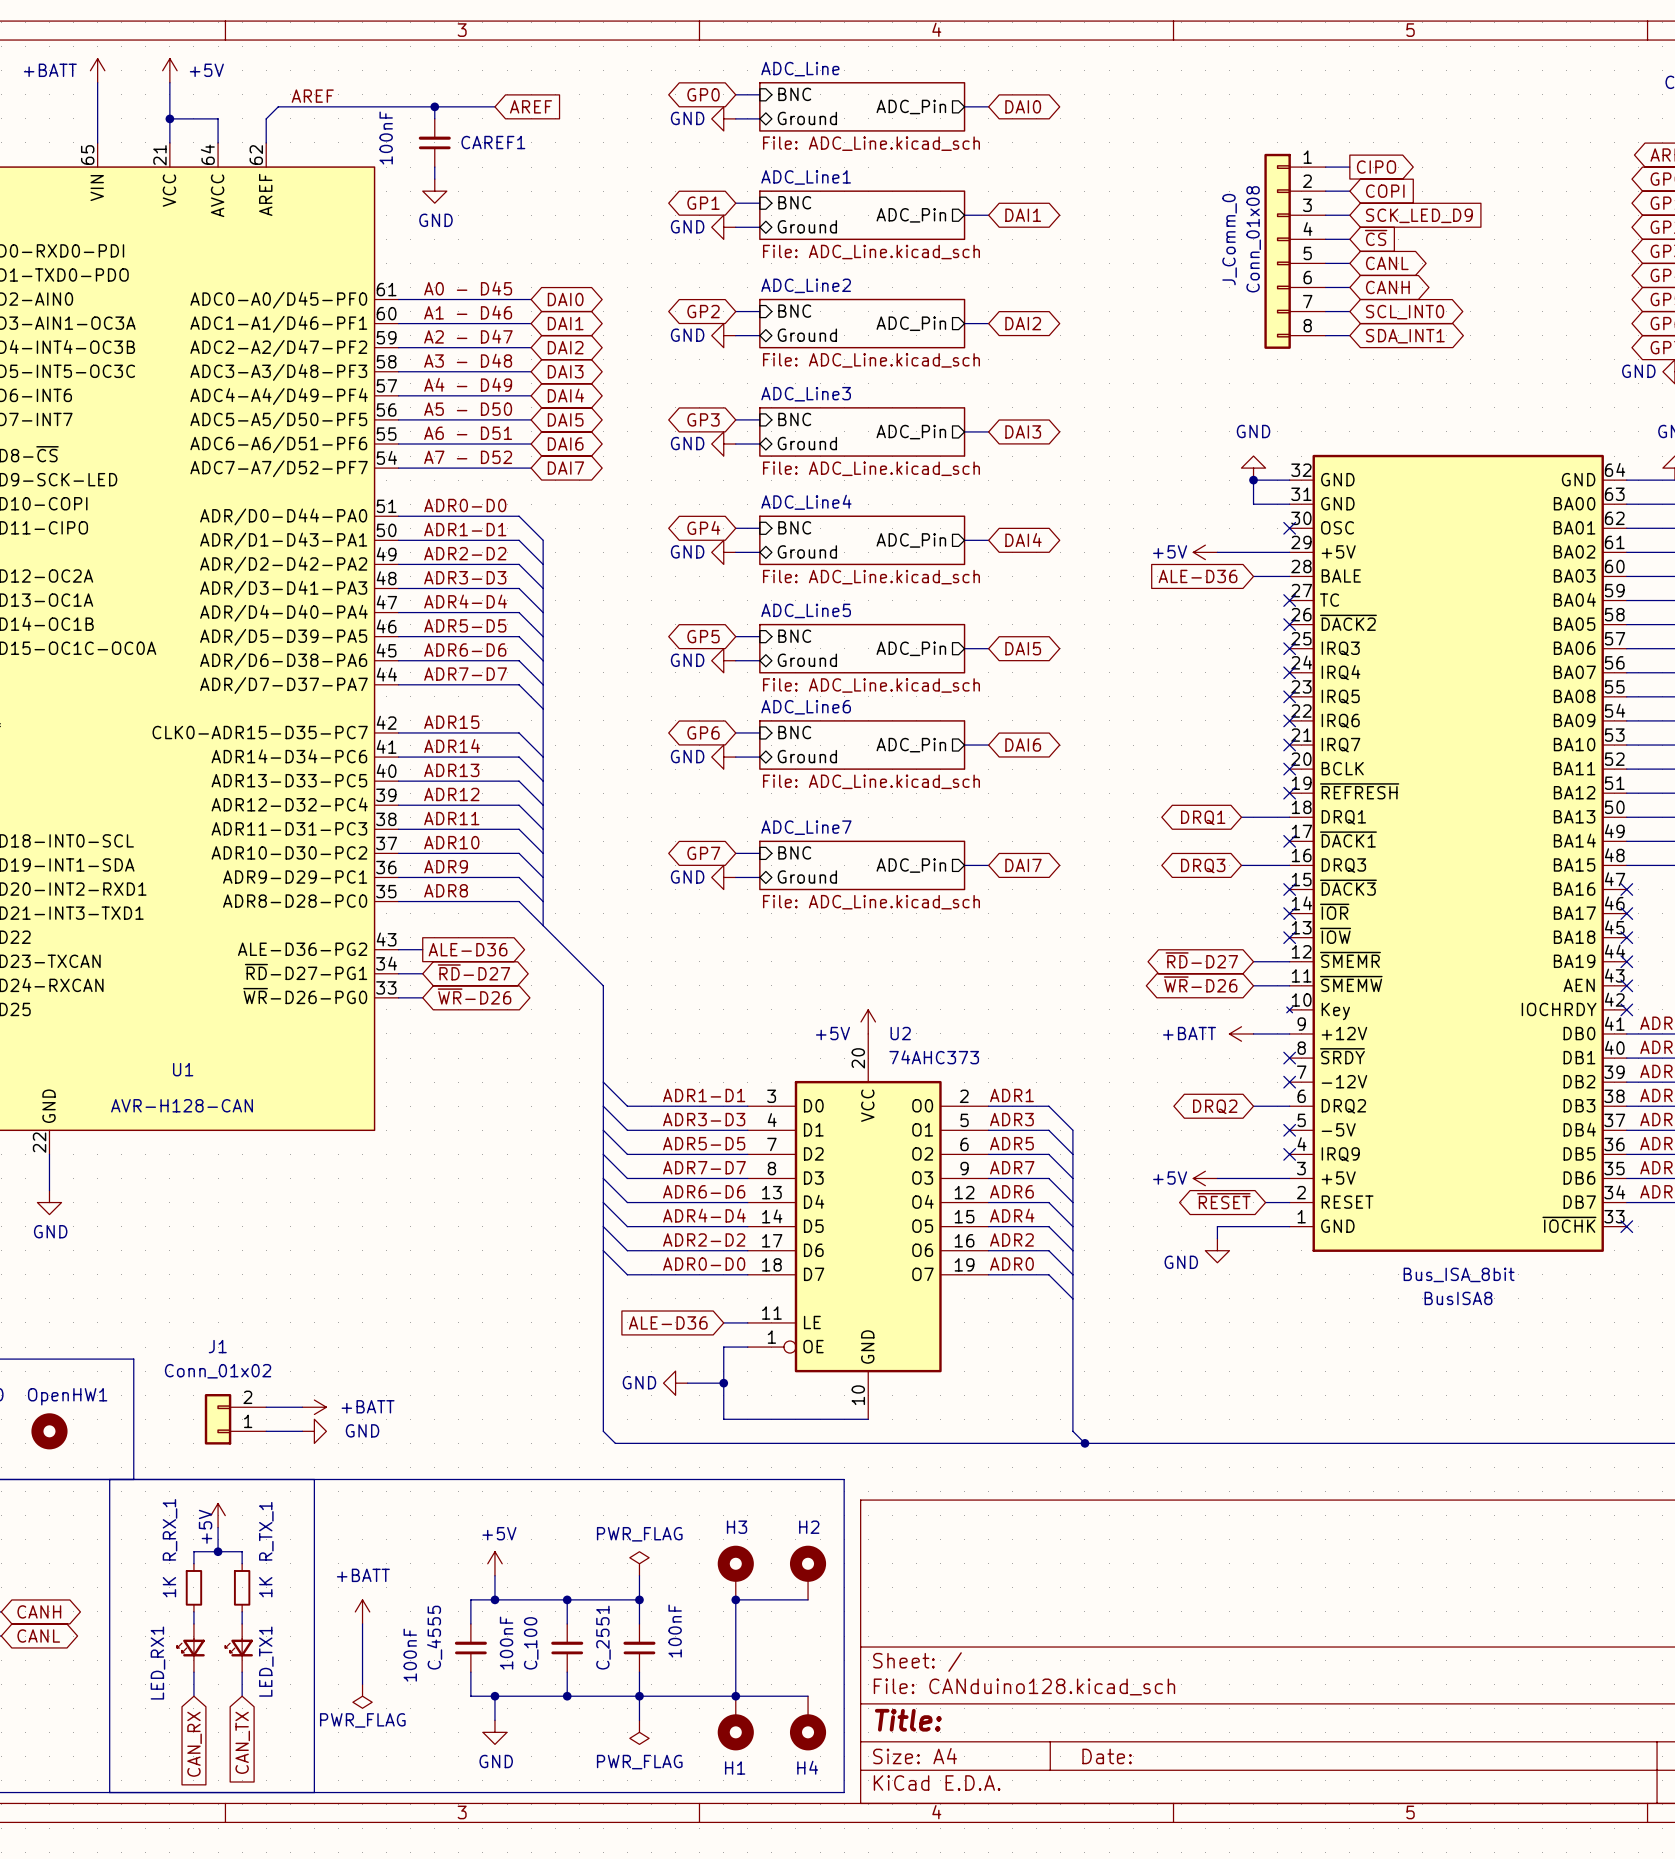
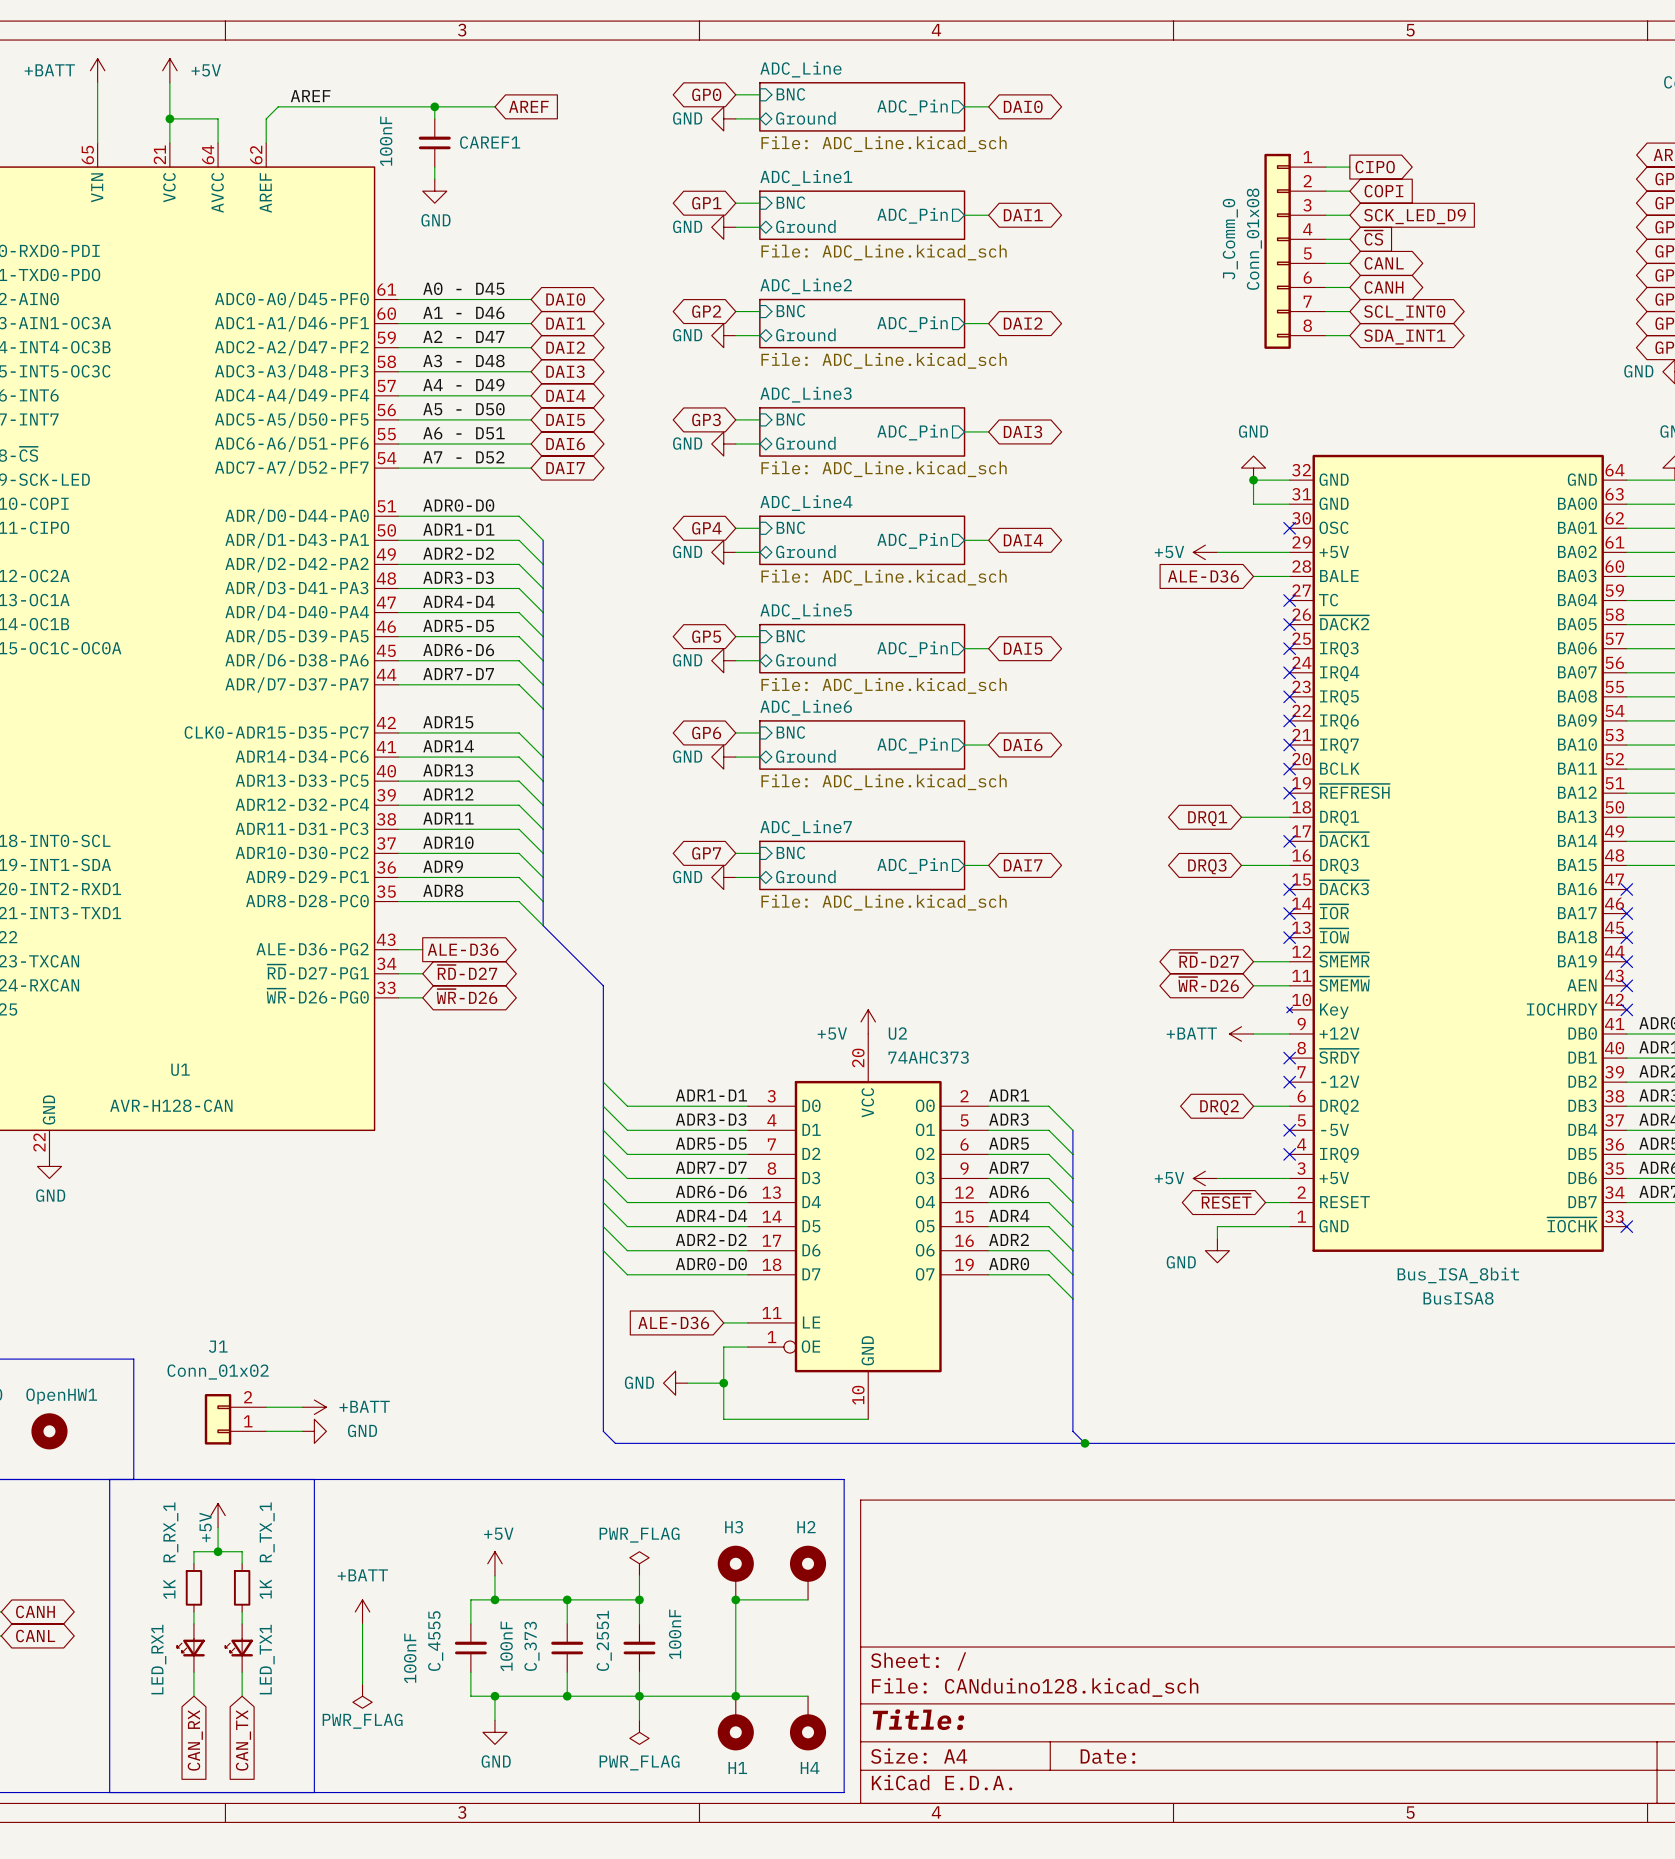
wire: (49, 1154) (49, 1190) -> none
power symbol position: GND (49, 1202) -> GND (49, 1166)
C_100 name: C_100 (531, 1643) -> C_373 (532, 1646)

